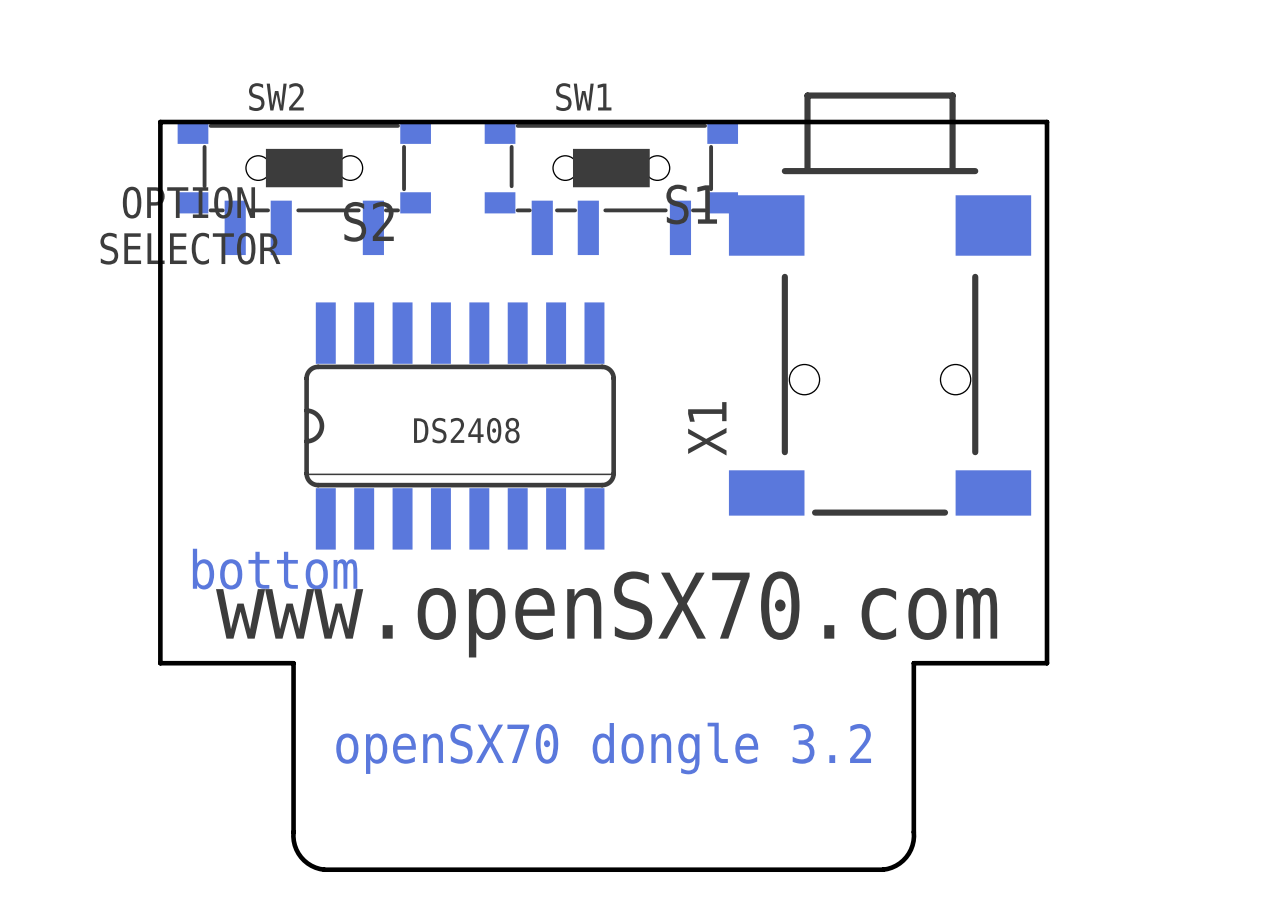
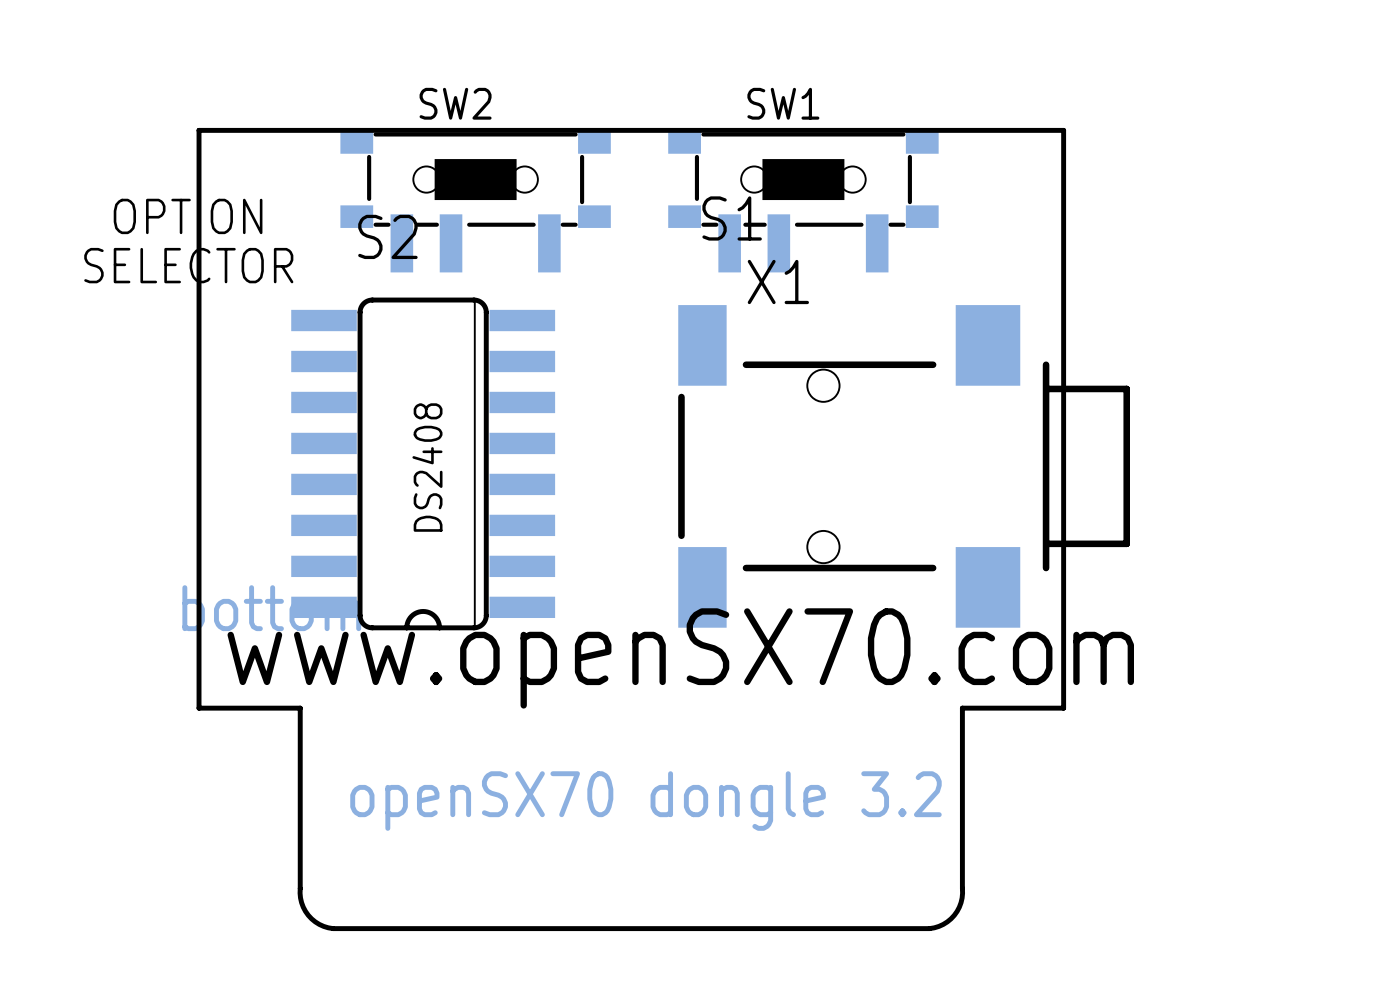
board edge: (198, 122) (160, 122) (160, 663) (198, 663) -> (199, 130) (199, 708)
board edge: (1008, 122) (1047, 122) (1047, 663) (1008, 663) -> (1063, 130) (1063, 708)
SW2 position: (304, 188) -> (475, 201)
SW1 position: (611, 188) -> (803, 201)
X1 rotation: 0° (880, 304) -> 90° clockwise (904, 466)
DS2408 rotation: 0° (460, 426) -> 90° counterclockwise (423, 463)

